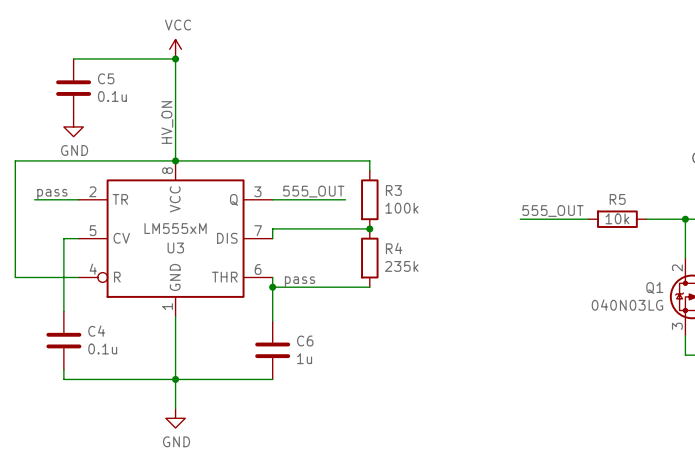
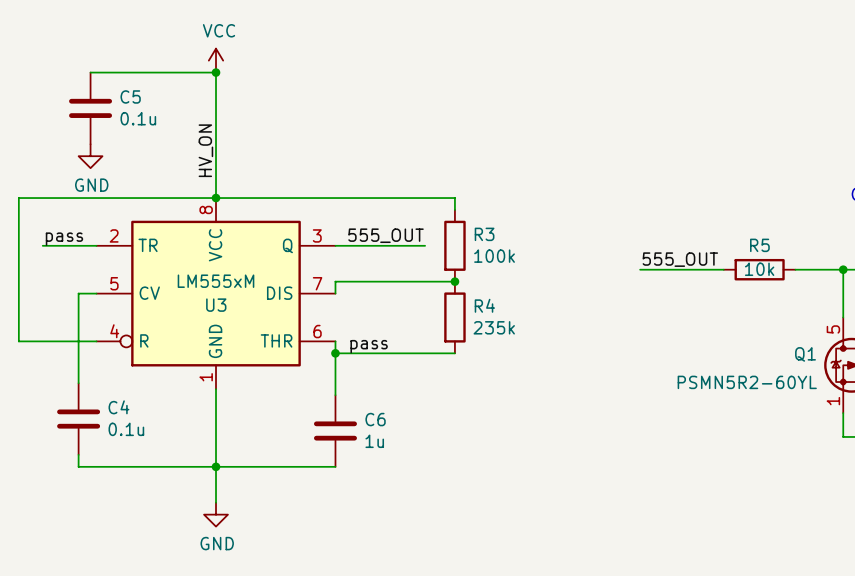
Q1 pin number: 2 (677, 268) -> 5 (833, 329)
Q1 value: 040N03LG (627, 305) -> PSMN5R2-60YL (747, 382)
Q1 pin number: 3 (677, 326) -> 1 (833, 401)

